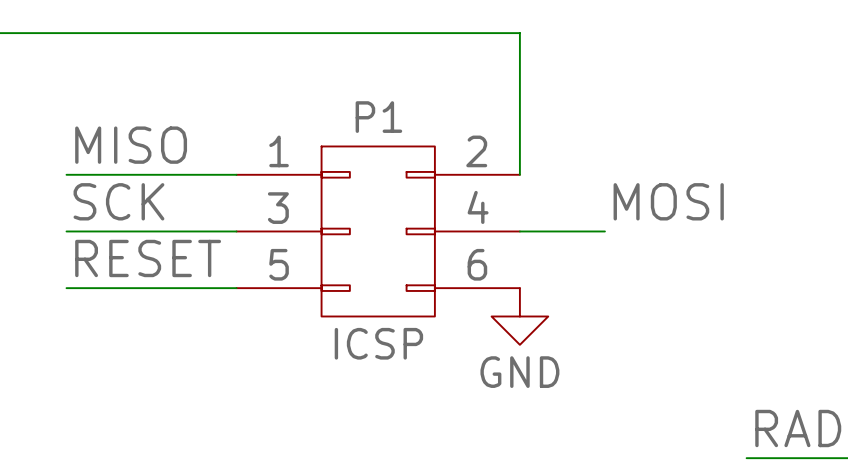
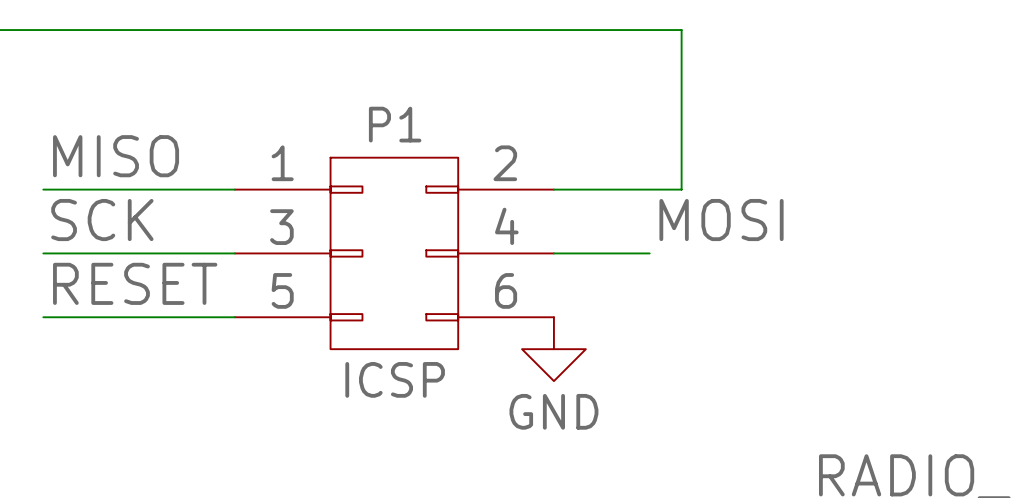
wire: (519, 33) (519, 174) -> (553, 30) (681, 30) (681, 189) (553, 189)

